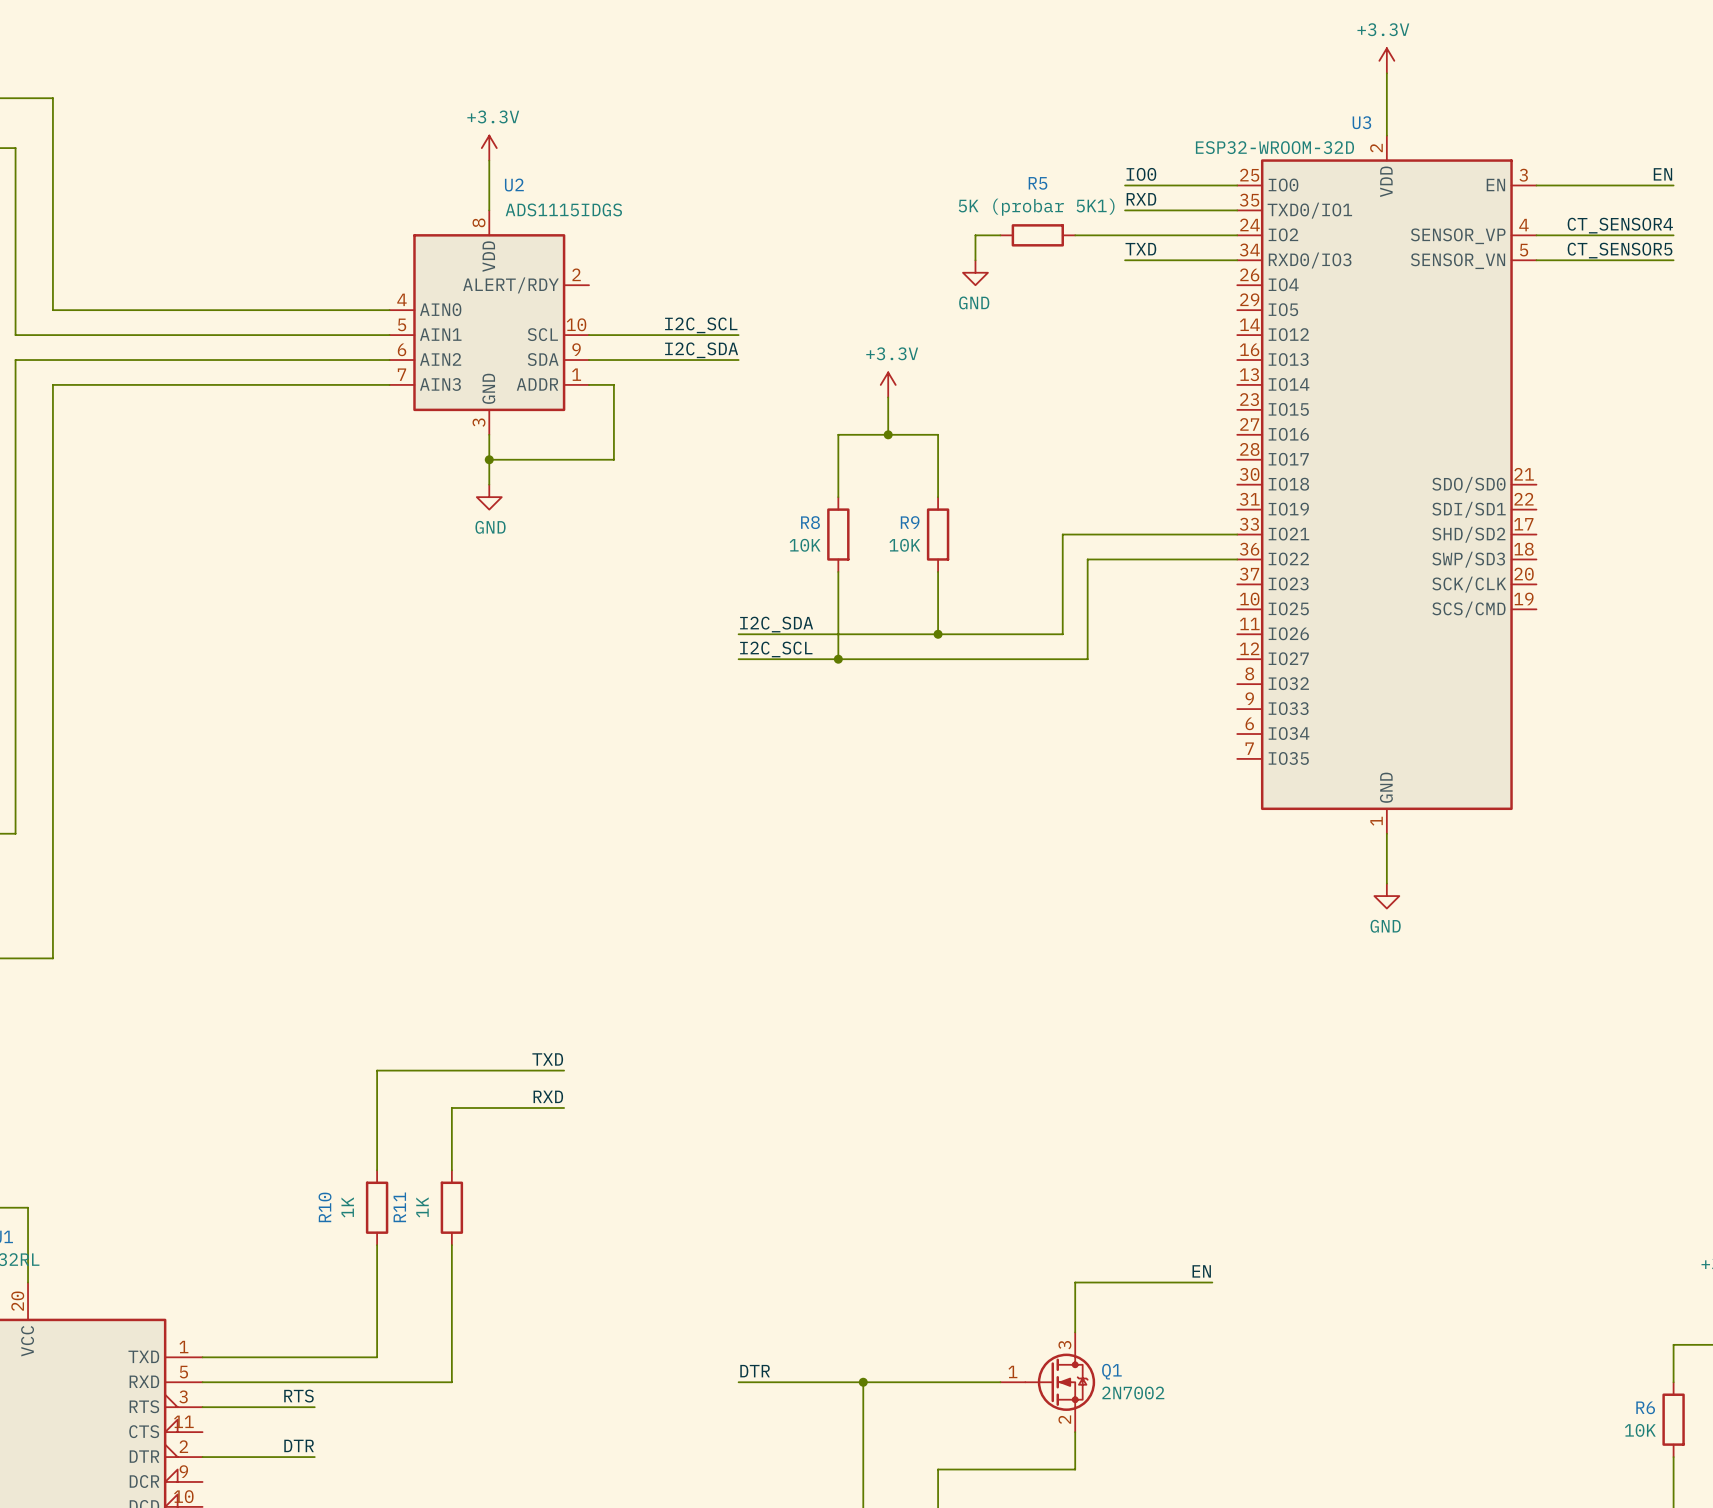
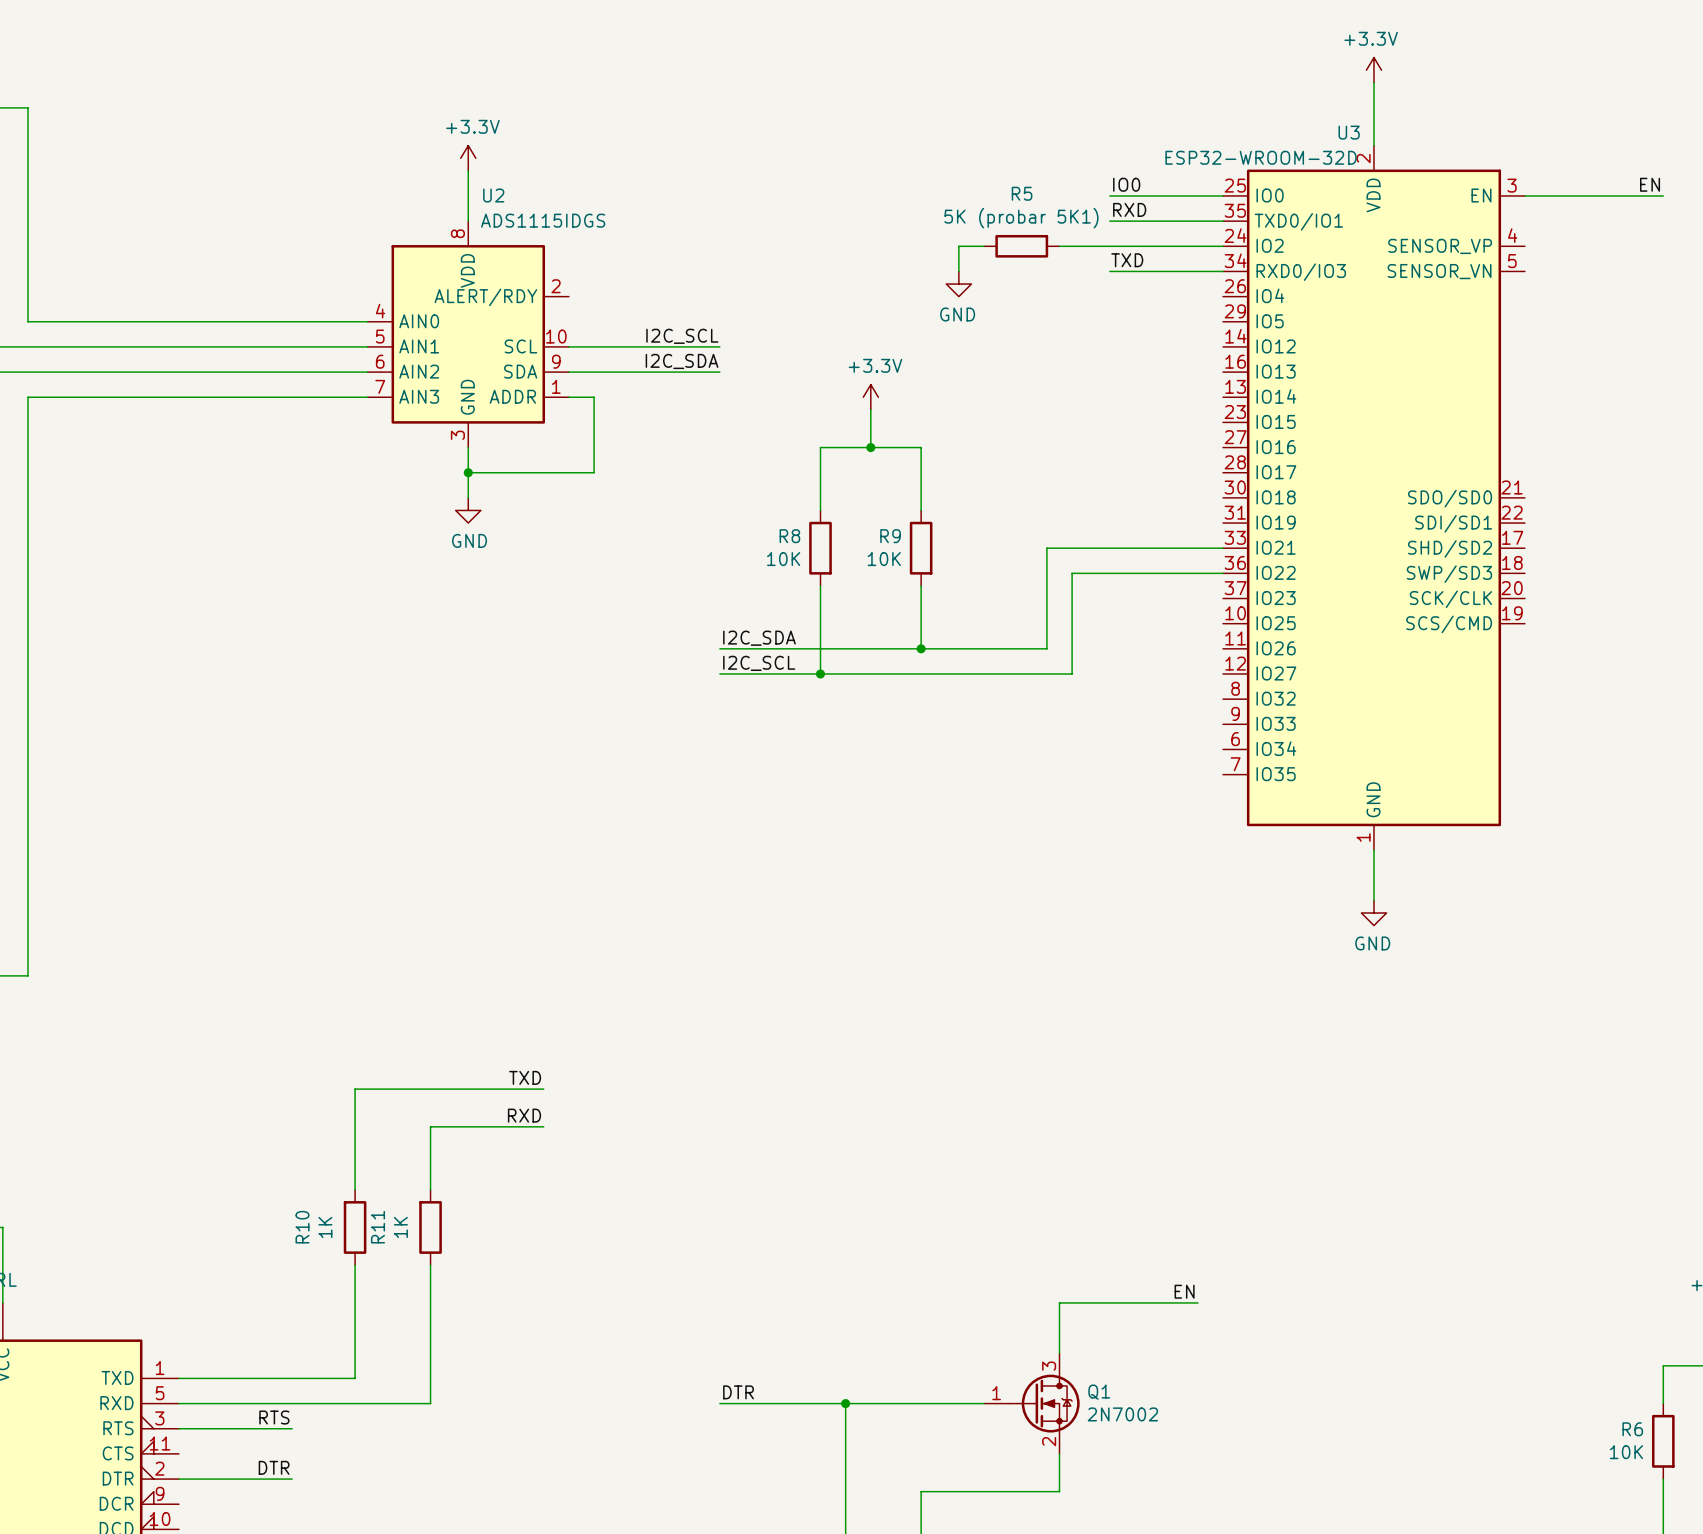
label: CT_SENSOR4 (1620, 225) -> none
wire: (1536, 235) (1673, 235) -> none
label: CT_SENSOR5 (1620, 250) -> none
wire: (1536, 260) (1673, 260) -> none

